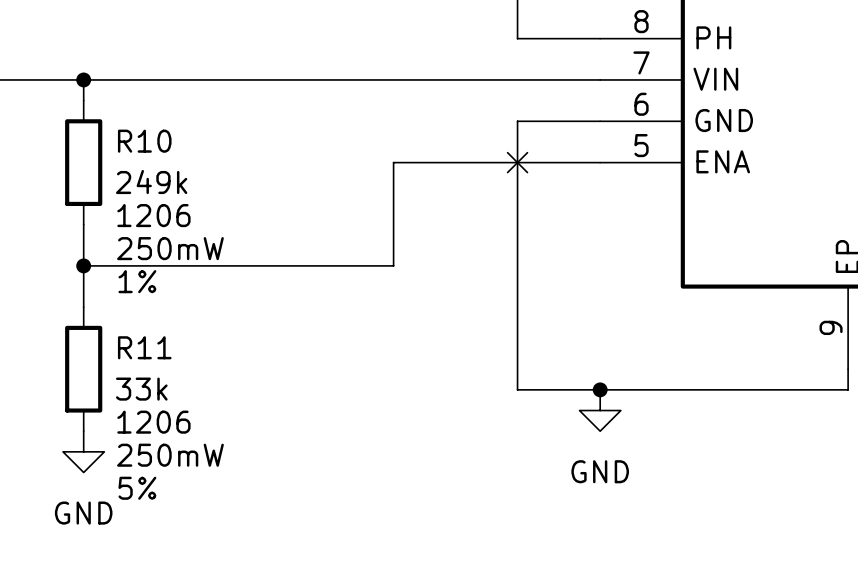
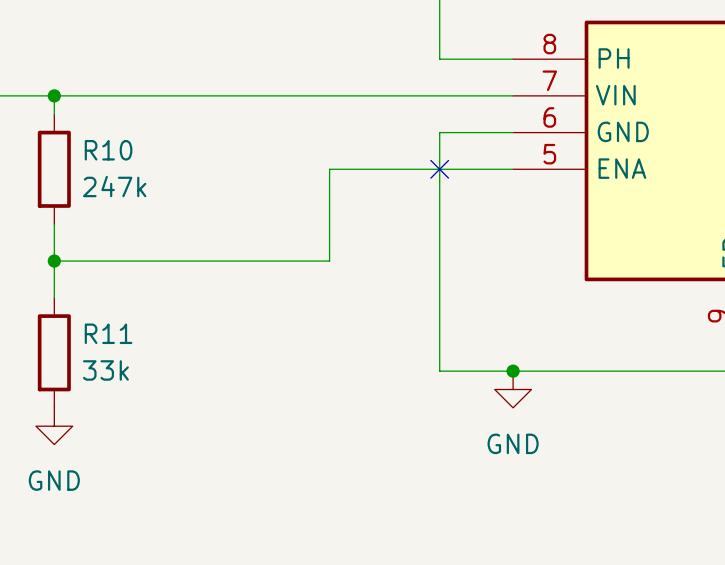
R10 value: 249k (151, 182) -> 247k (114, 186)
R10 text: 1206 (153, 215) -> none
R10 text: 250mW (170, 248) -> none
R10 text: 1% (137, 281) -> none
R11 text: 1206 (153, 422) -> none
R11 text: 250mW (170, 455) -> none
R11 text: 5% (137, 488) -> none

